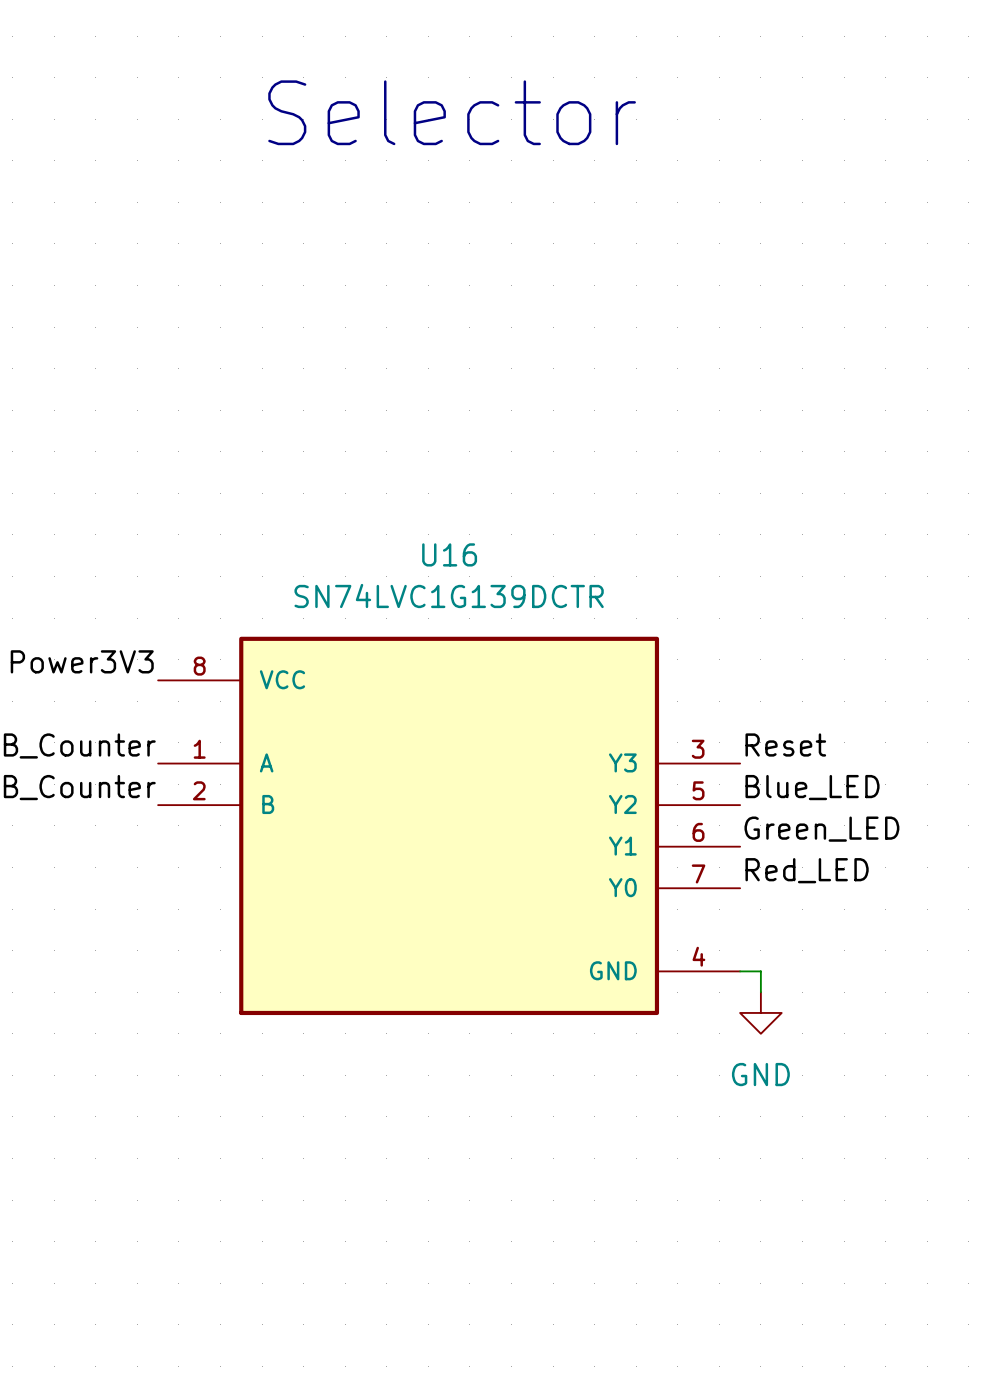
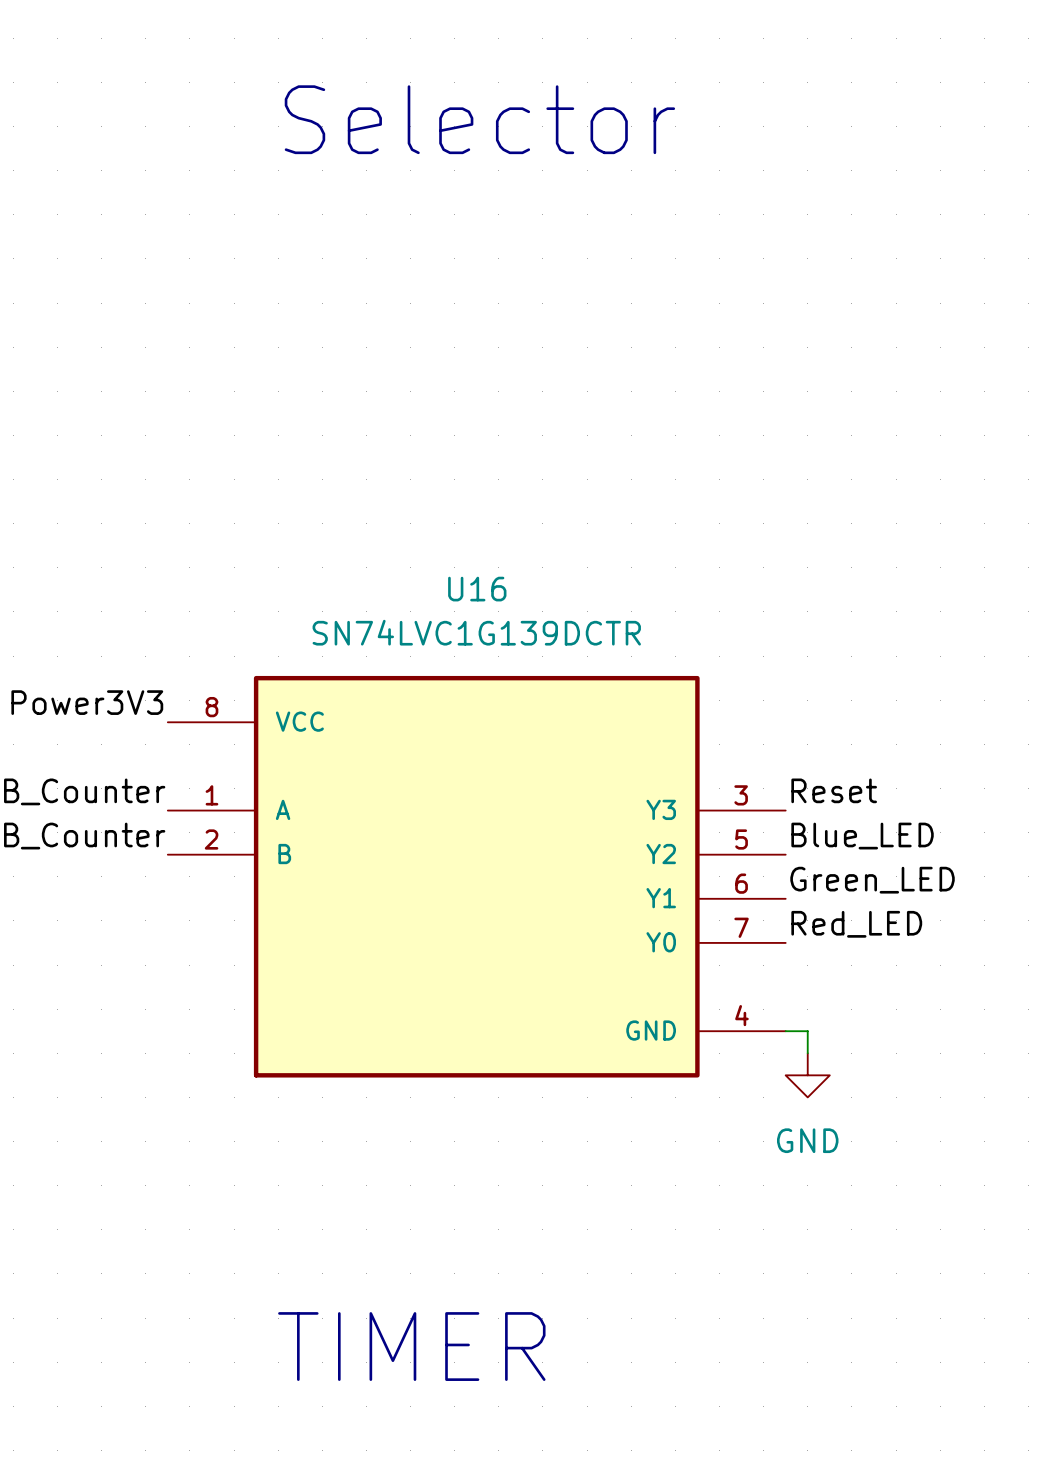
text: none -> TIMER (411, 1346)

